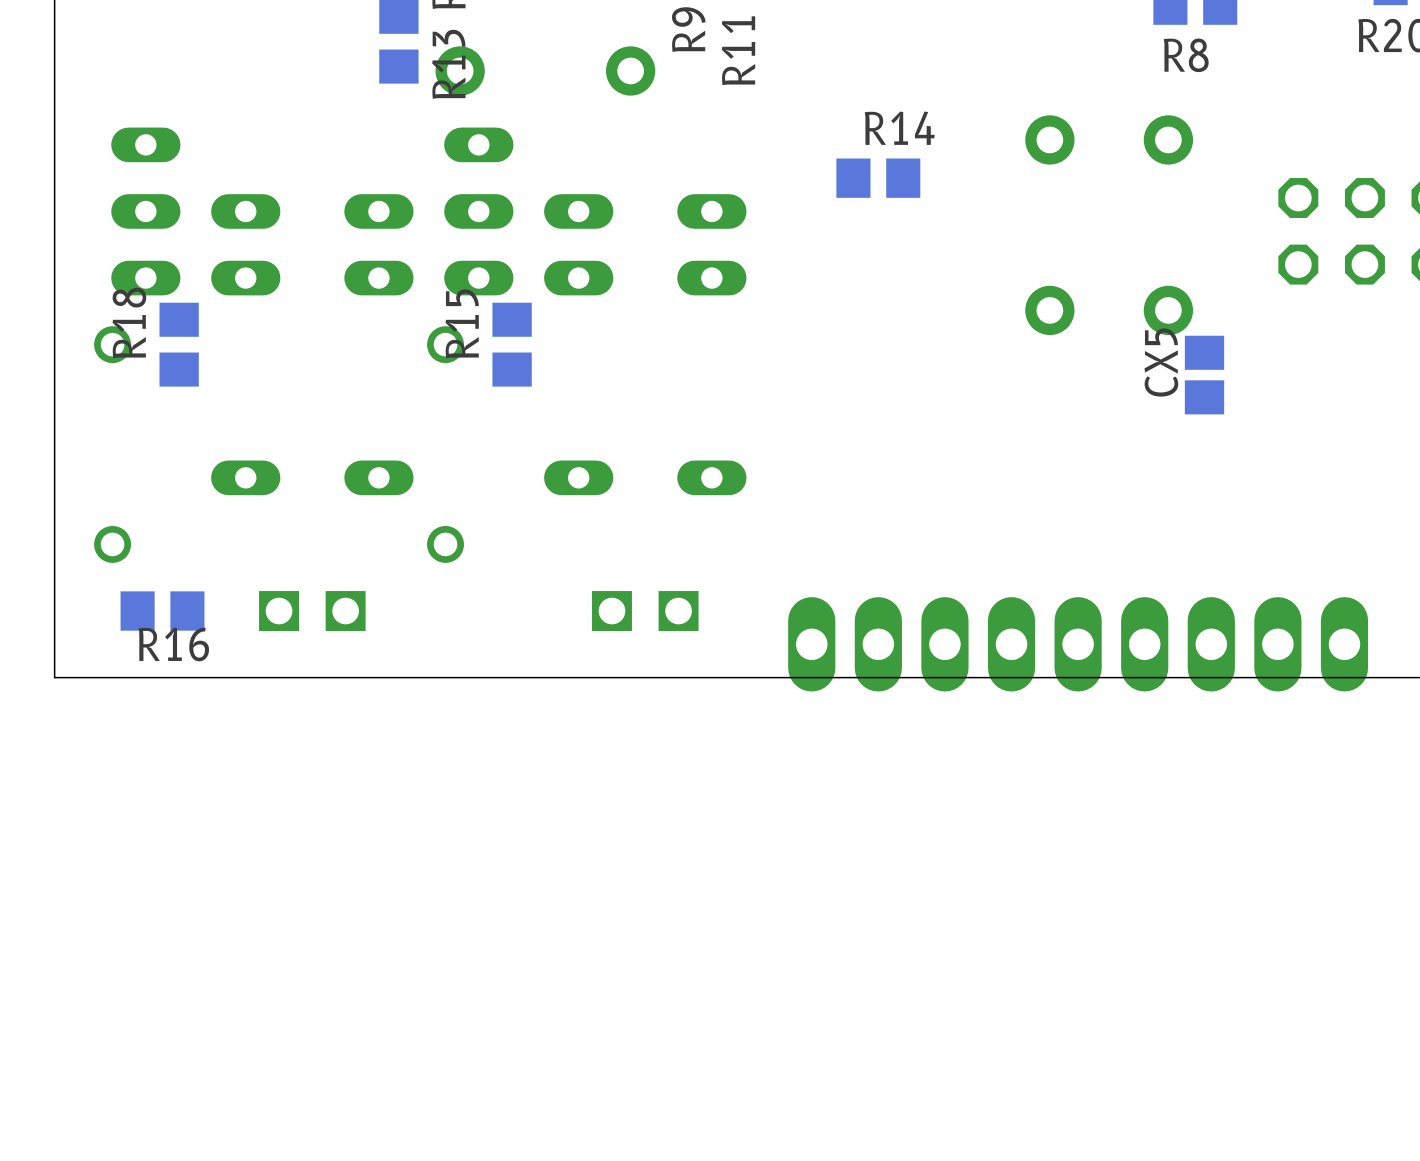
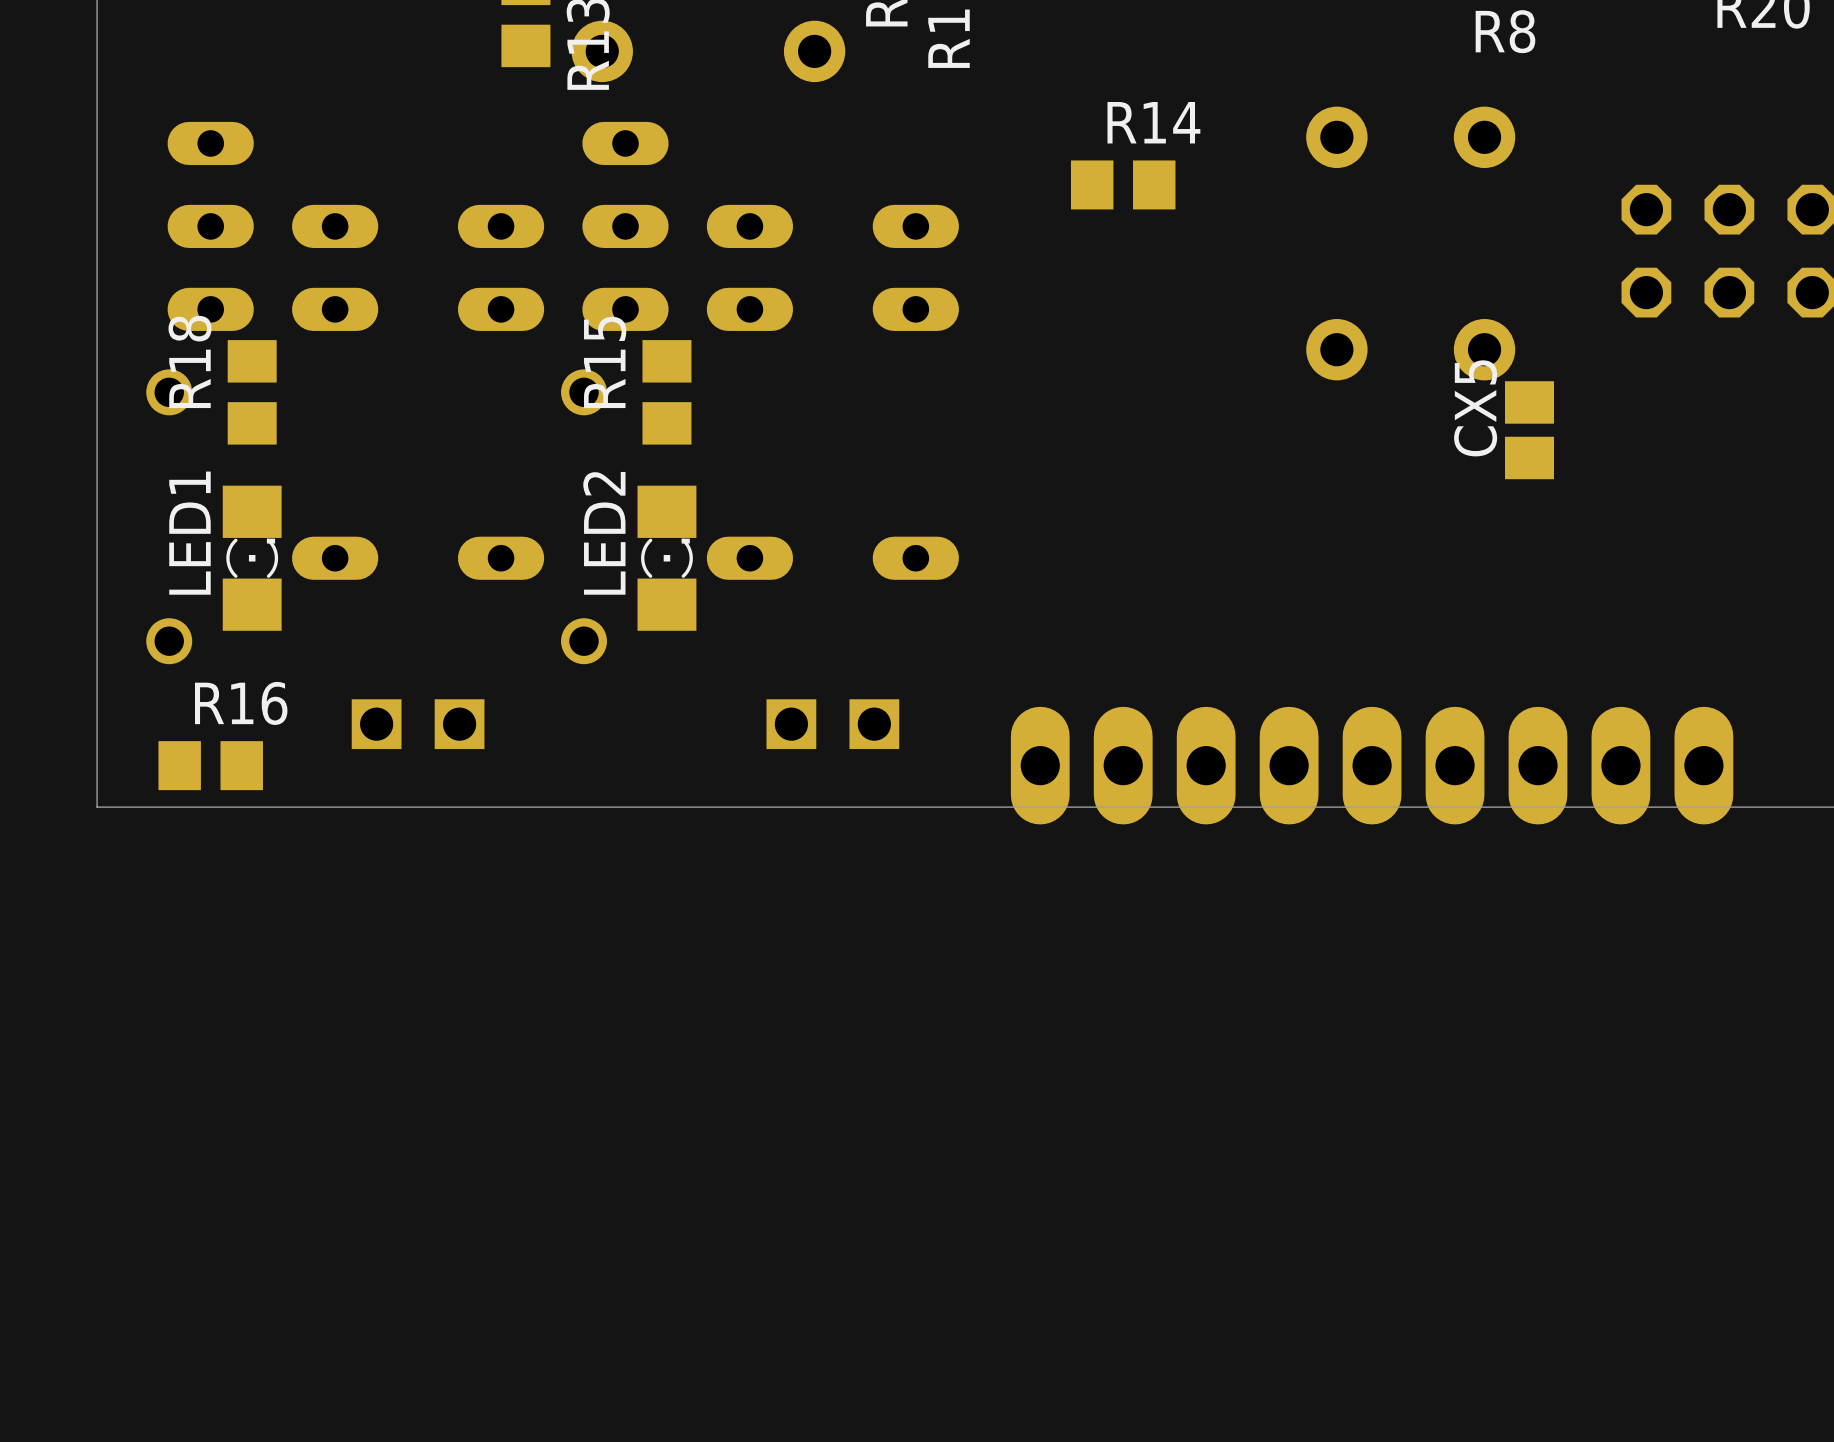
LED1: none -> (252, 558)
LED2: none -> (666, 558)
R16 position: (162, 611) -> (210, 765)
R16 name position: R16 (173, 644) -> R16 (241, 703)

